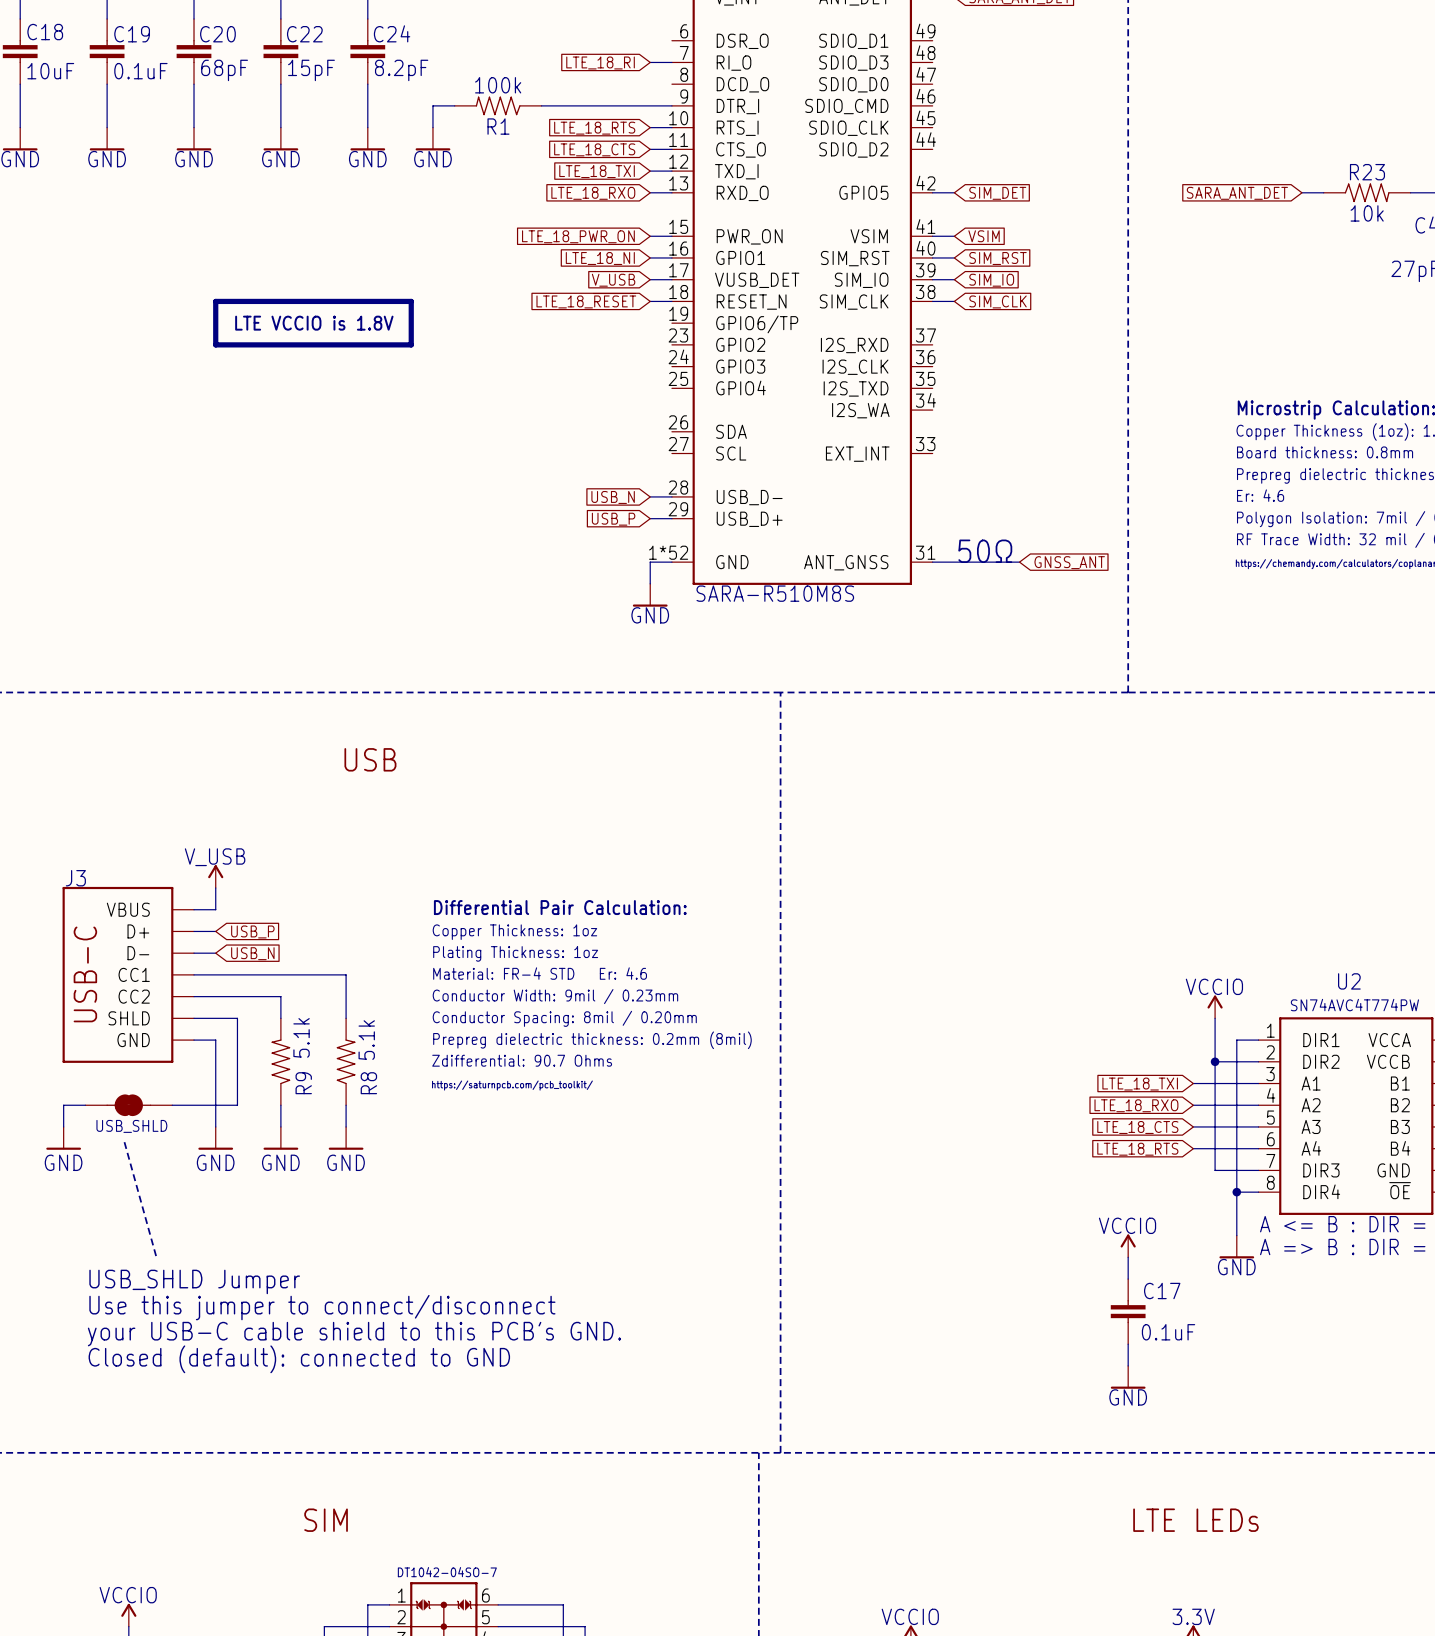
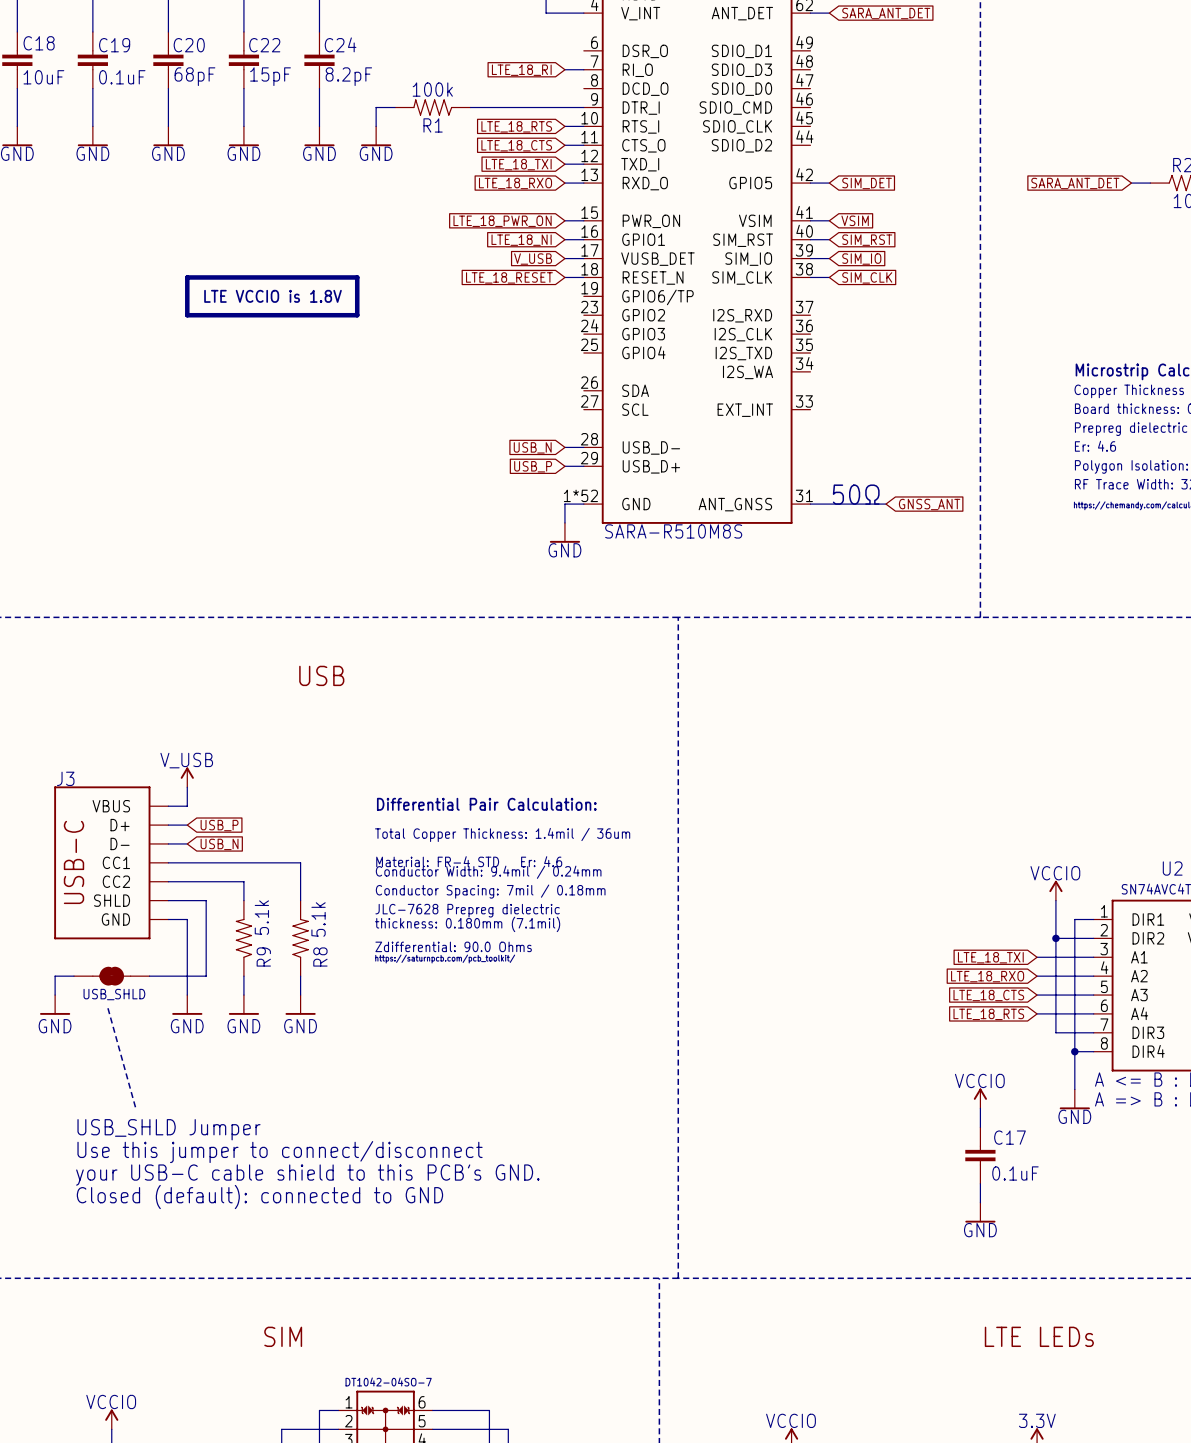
text: Copper Thickness: 1oz (514, 932) -> Total Copper Thickness: 1.4mil / 36um (502, 834)
text: Plating Thickness: 1oz (515, 953) -> none
text: none -> Conductor Width: 9.4mil / 0.24mm (488, 872)
text: Conductor Width: 9mil / 0.23mm (555, 996) -> Conductor Spacing: 7mil / 0.18mm (490, 891)
text: Conductor Spacing: 8mil / 0.20mm (564, 1018) -> JLC-7628 Prepreg dielectric (467, 910)
text: Prepreg dielectric thickness: 0.2mm (8mil) (592, 1040) -> thickness: 0.180mm (7.1mil) (467, 924)
text: Zdifferential: 90.7 Ohms (522, 1060) -> Zdifferential: 90.0 Ohms (453, 946)

